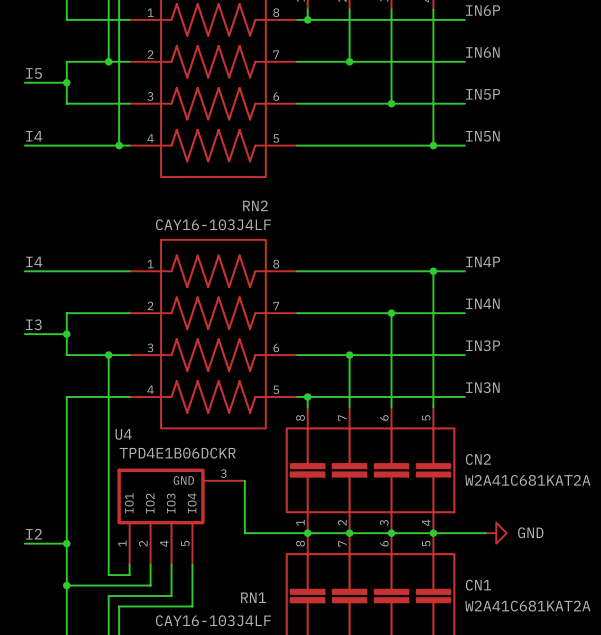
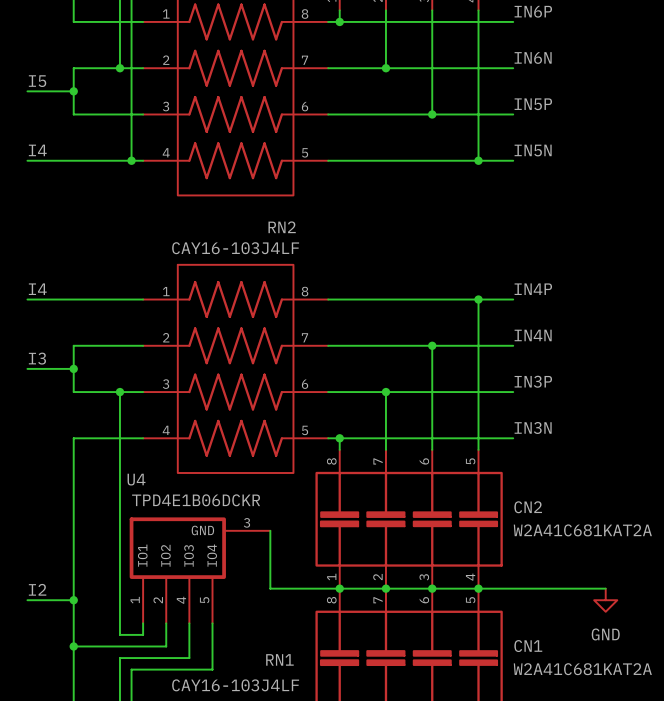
wire: none -> (536, 588) (605, 588)
power symbol rotation: 0° (496, 533) -> 90° clockwise (605, 600)
power symbol position: GND (496, 533) -> GND (605, 600)

